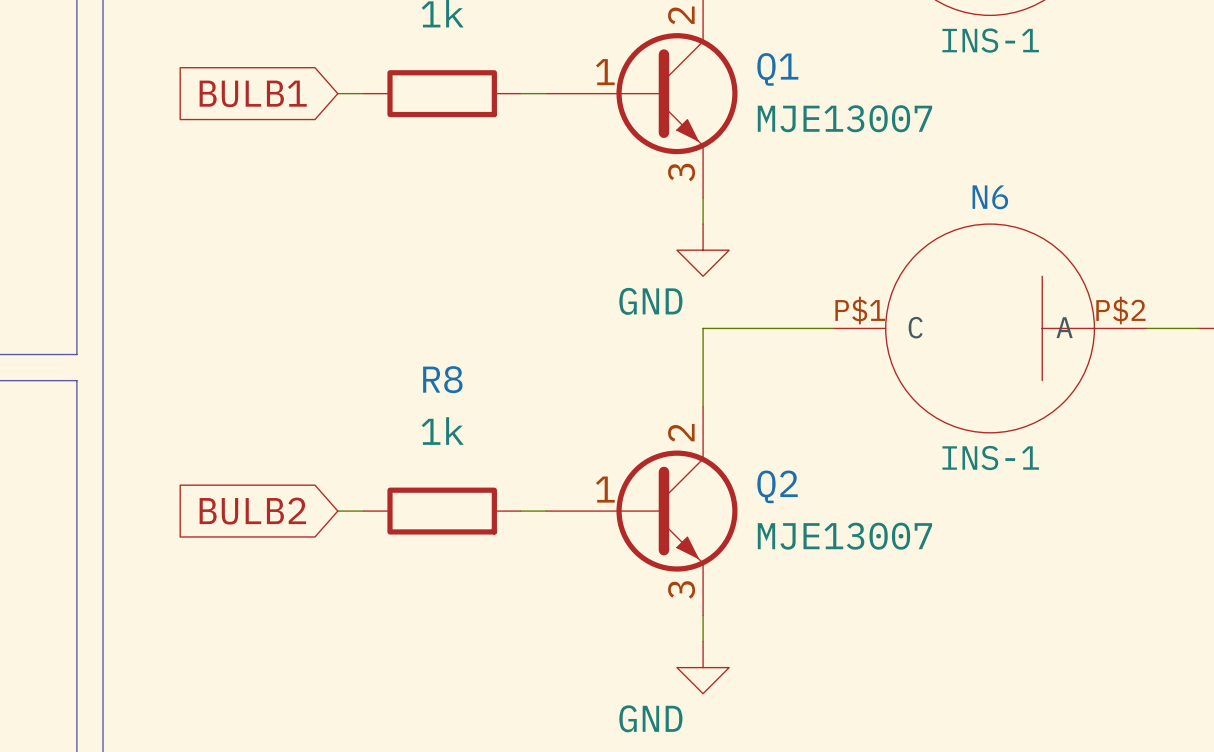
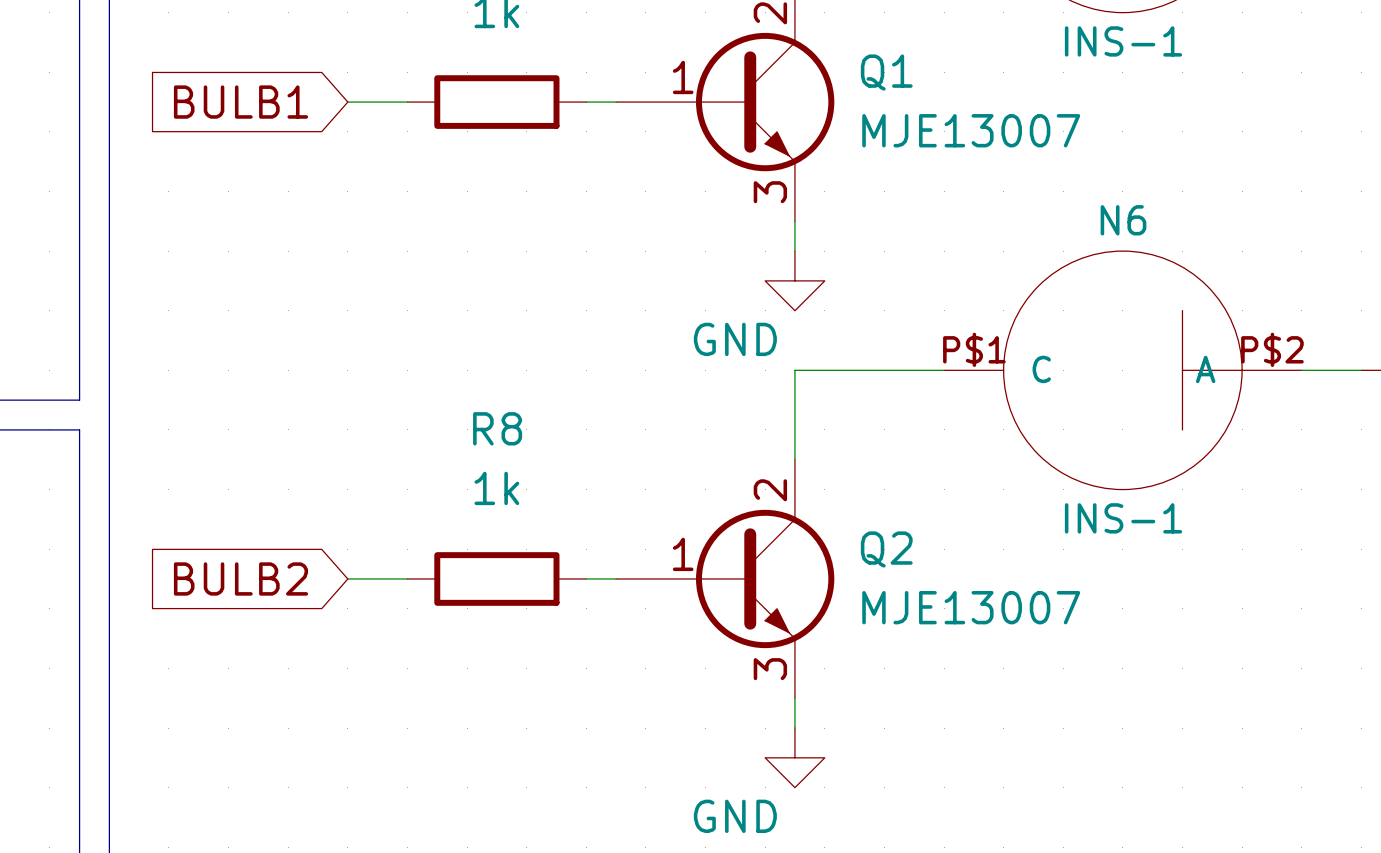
global label position: BULB1 (253, 93) -> BULB1 (240, 102)
wire: none -> (347, 102) (377, 102)
global label position: BULB2 (252, 511) -> BULB2 (240, 578)
wire: none -> (347, 578) (377, 578)

